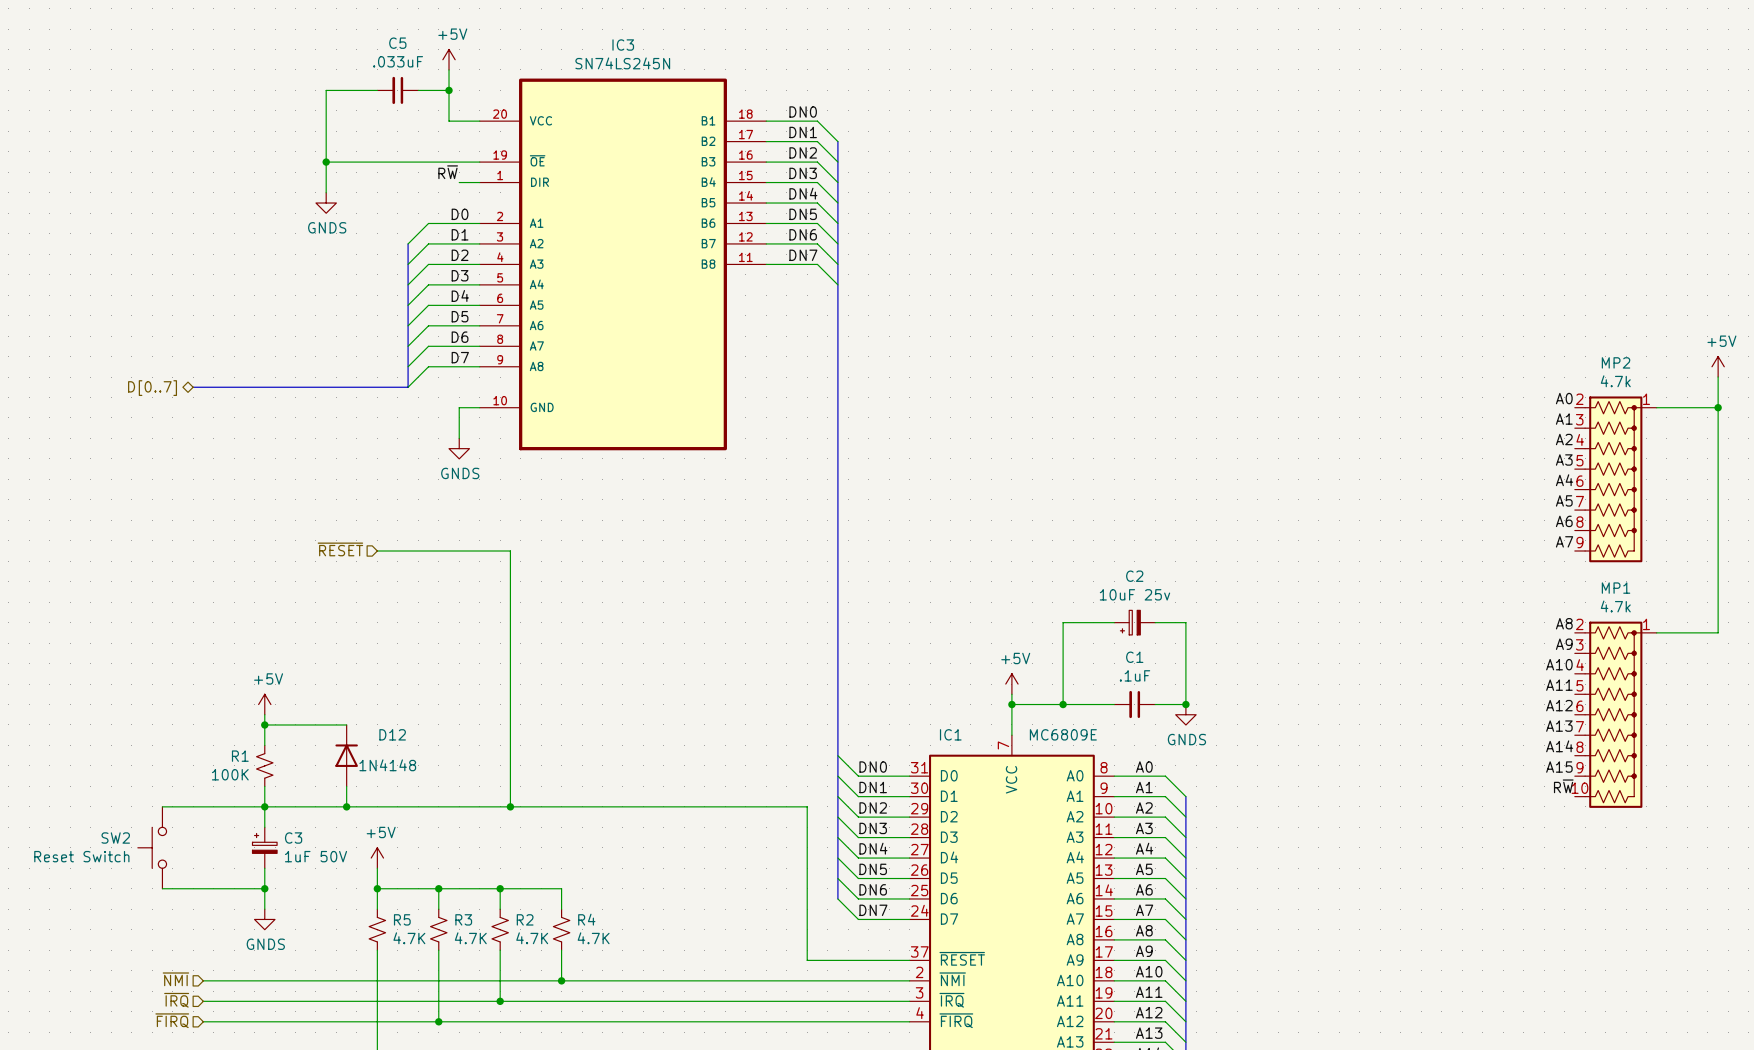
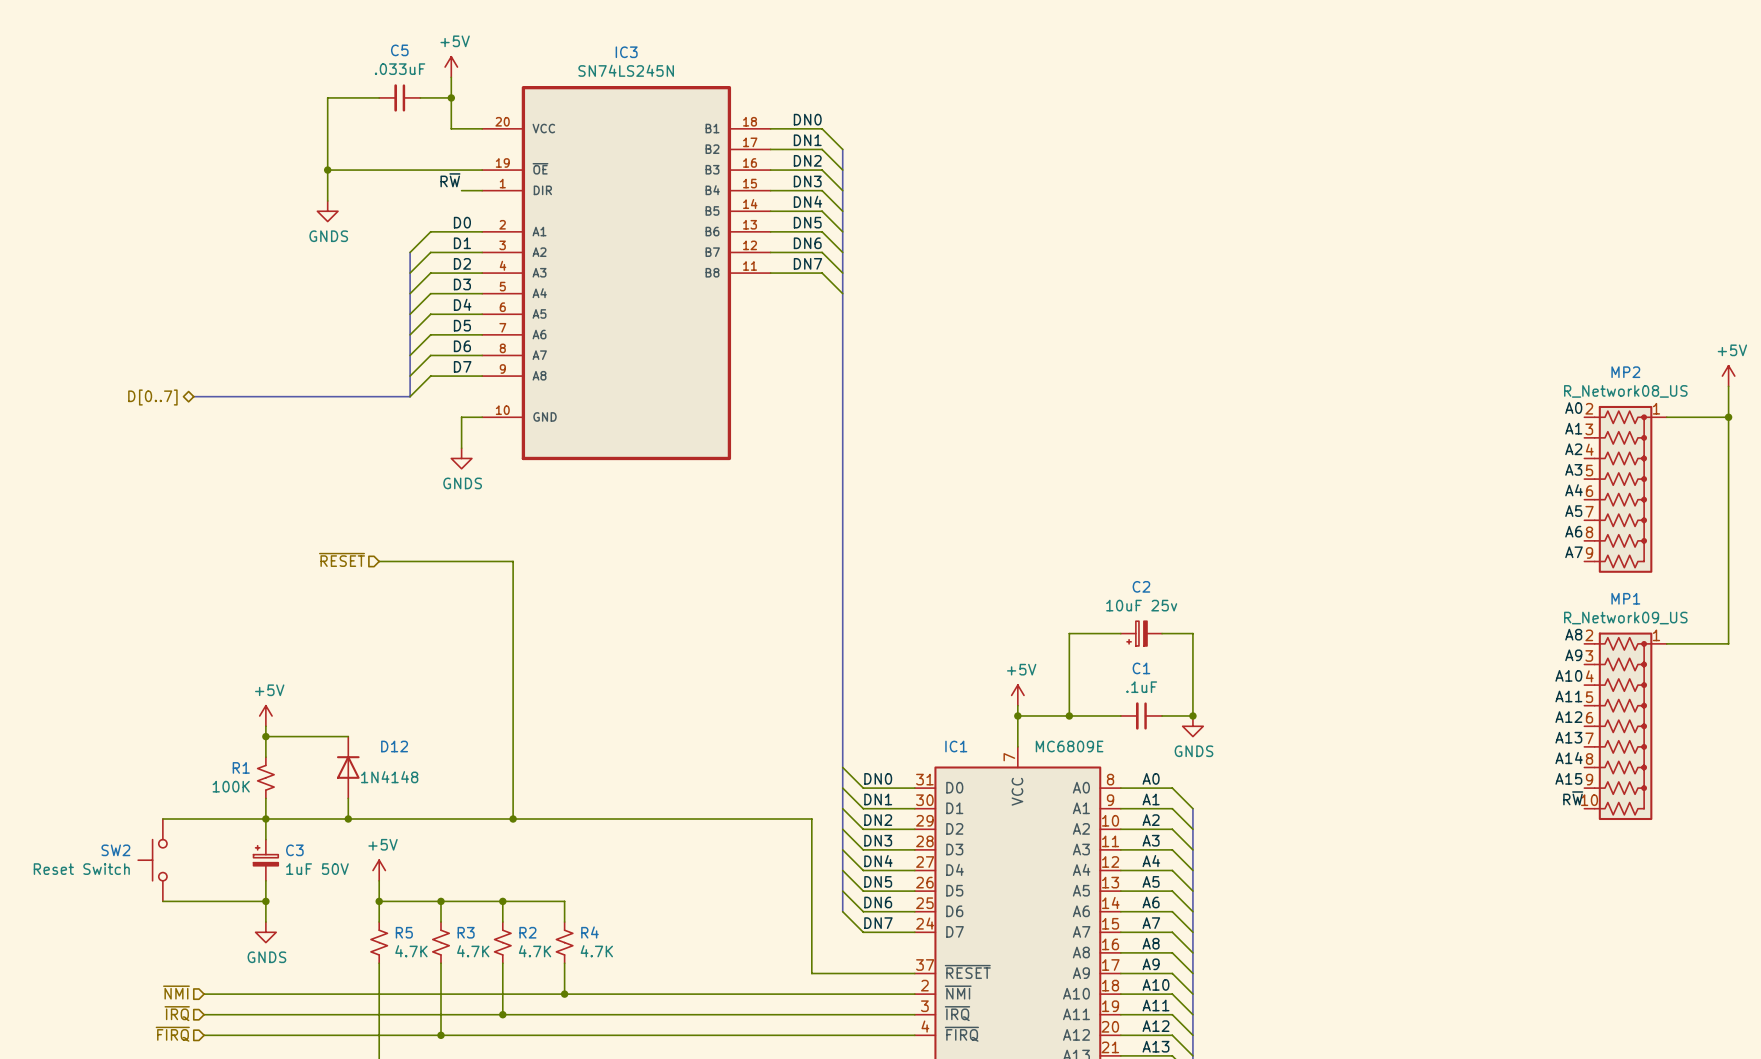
MP2 value: 4.7k (1615, 381) -> R_Network08_US (1625, 391)
MP1 value: 4.7k (1615, 606) -> R_Network09_US (1625, 618)

